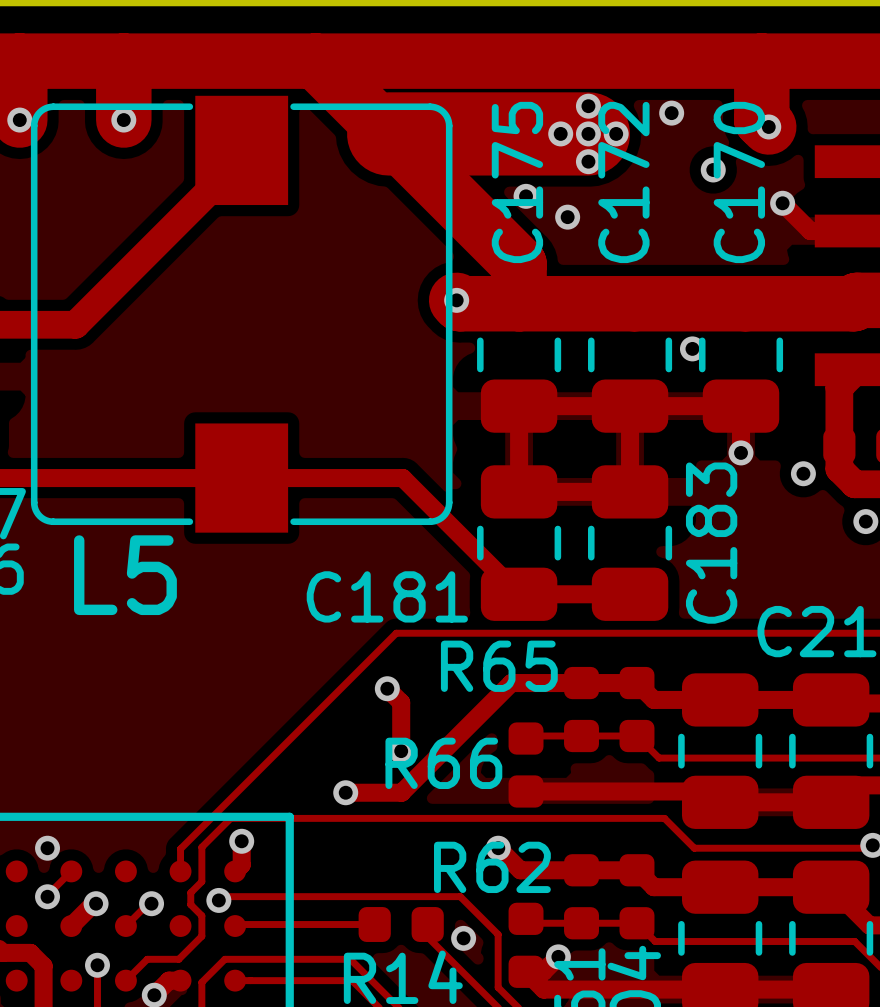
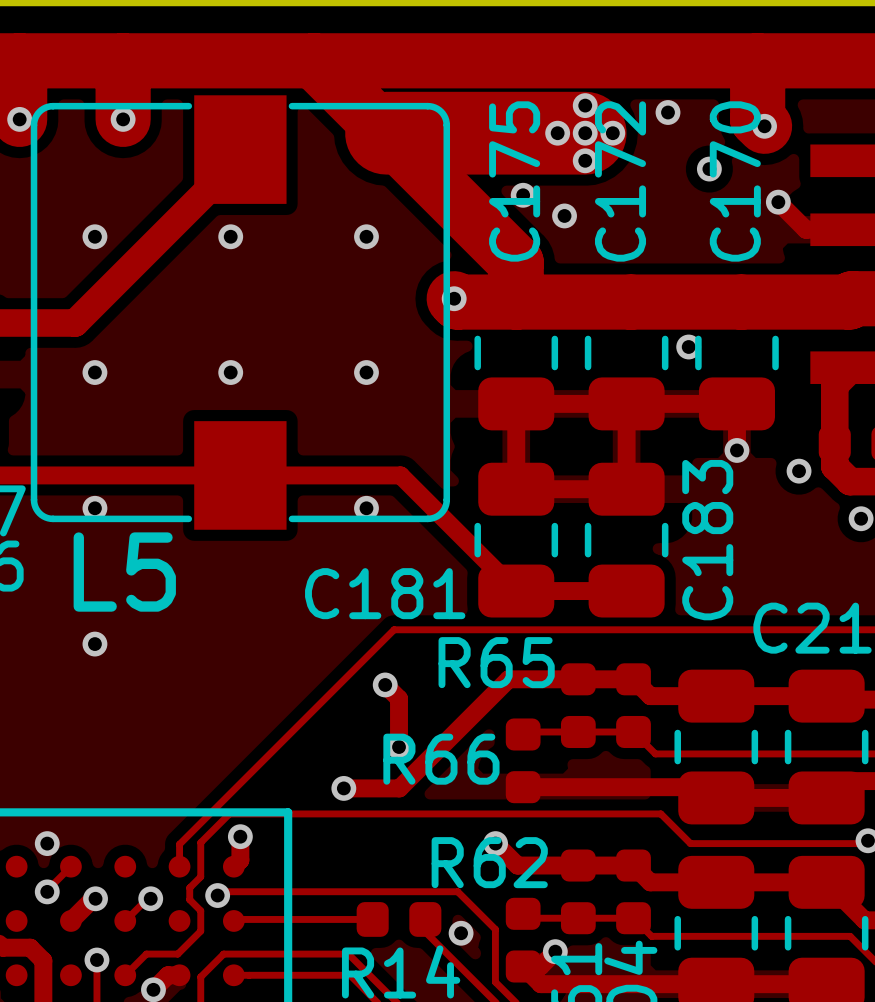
via: none -> (94, 236)
via: none -> (230, 236)
via: none -> (366, 236)
via: none -> (94, 372)
via: none -> (230, 372)
via: none -> (366, 372)
via: none -> (94, 508)
via: none -> (366, 508)
via: none -> (94, 644)

